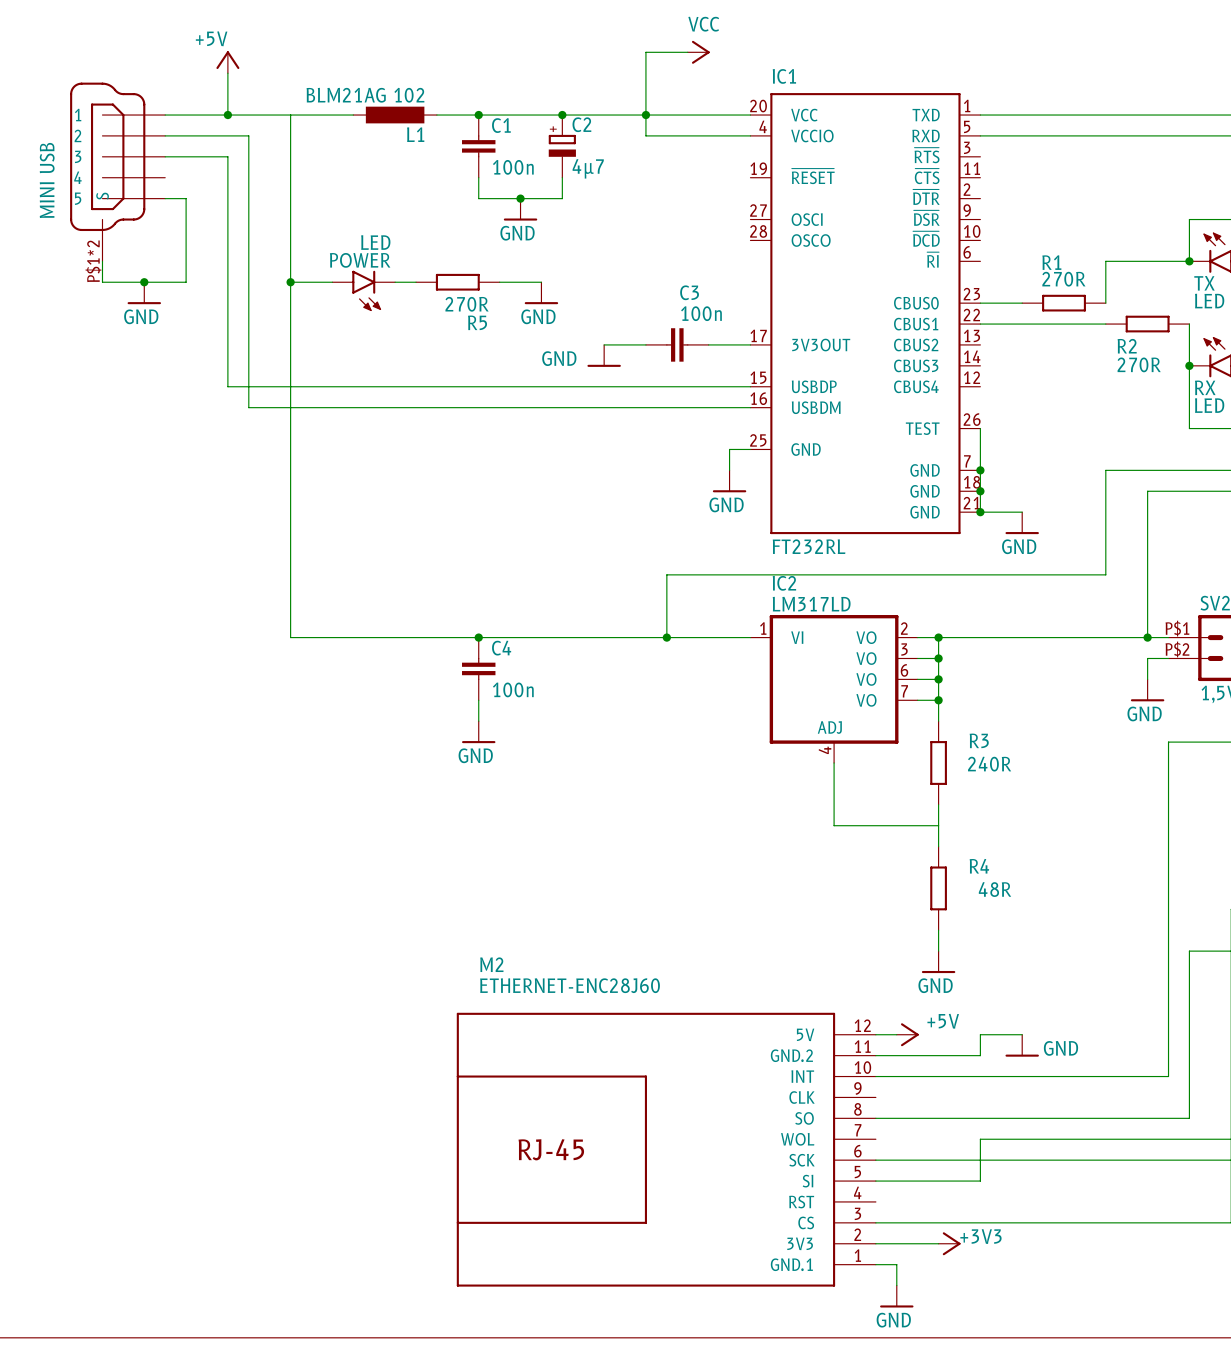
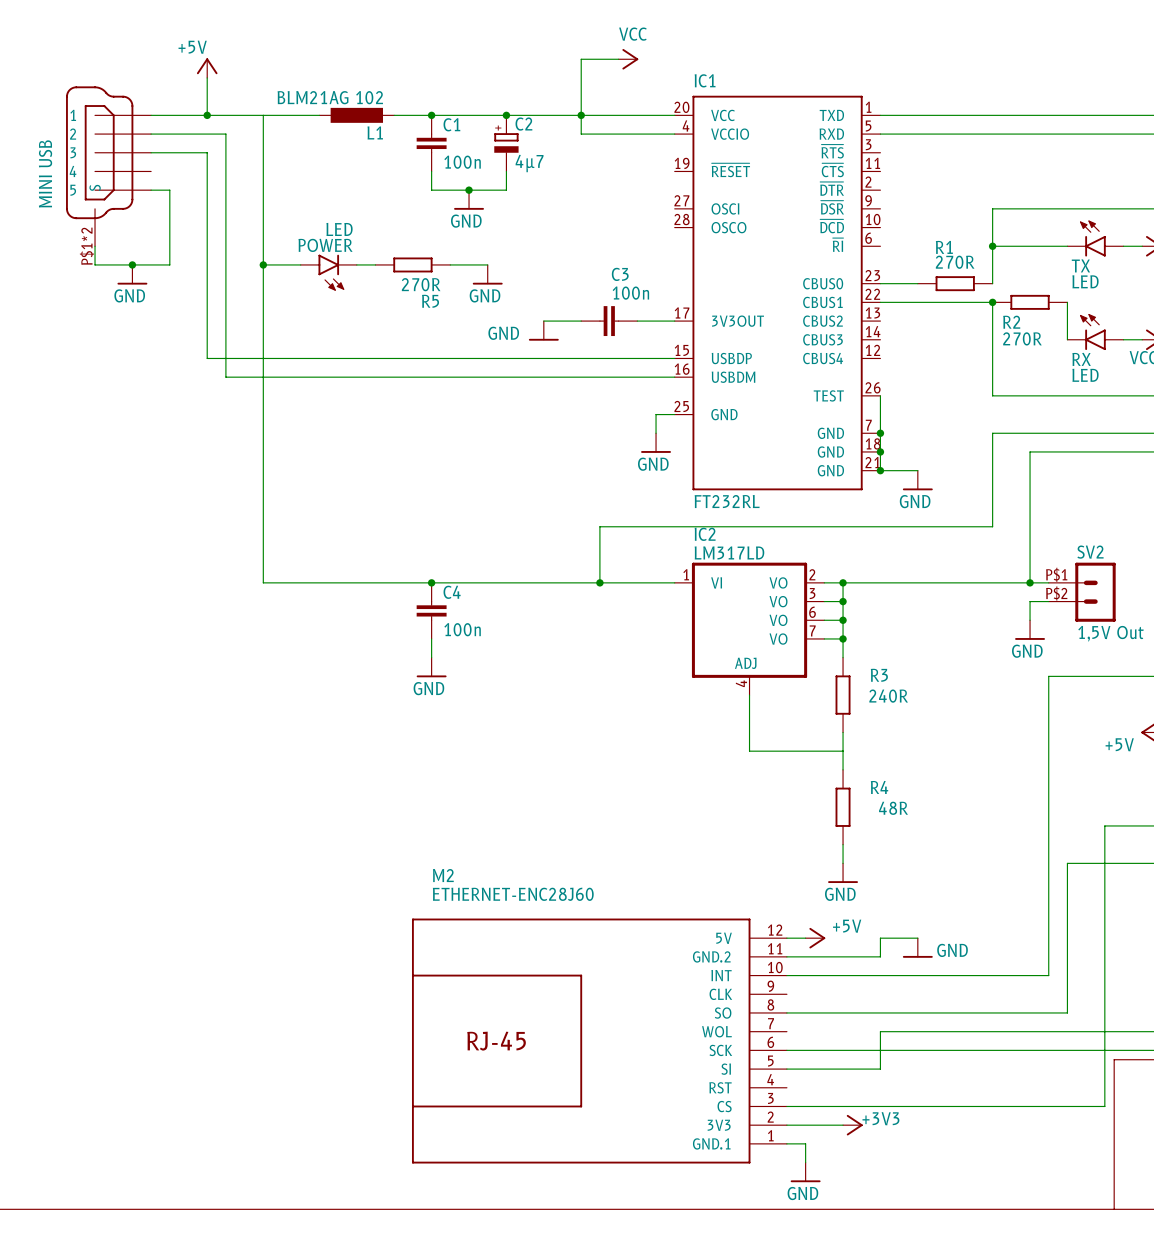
wire: (1189, 219) (1189, 261) -> (1067, 208) (992, 208) (992, 246)
junction: none -> (992, 246)
junction: (1189, 261) -> none
junction: none -> (992, 302)
wire: (1189, 365) (1189, 428) -> (992, 302) (992, 395) (1067, 395)
junction: (1189, 365) -> none

